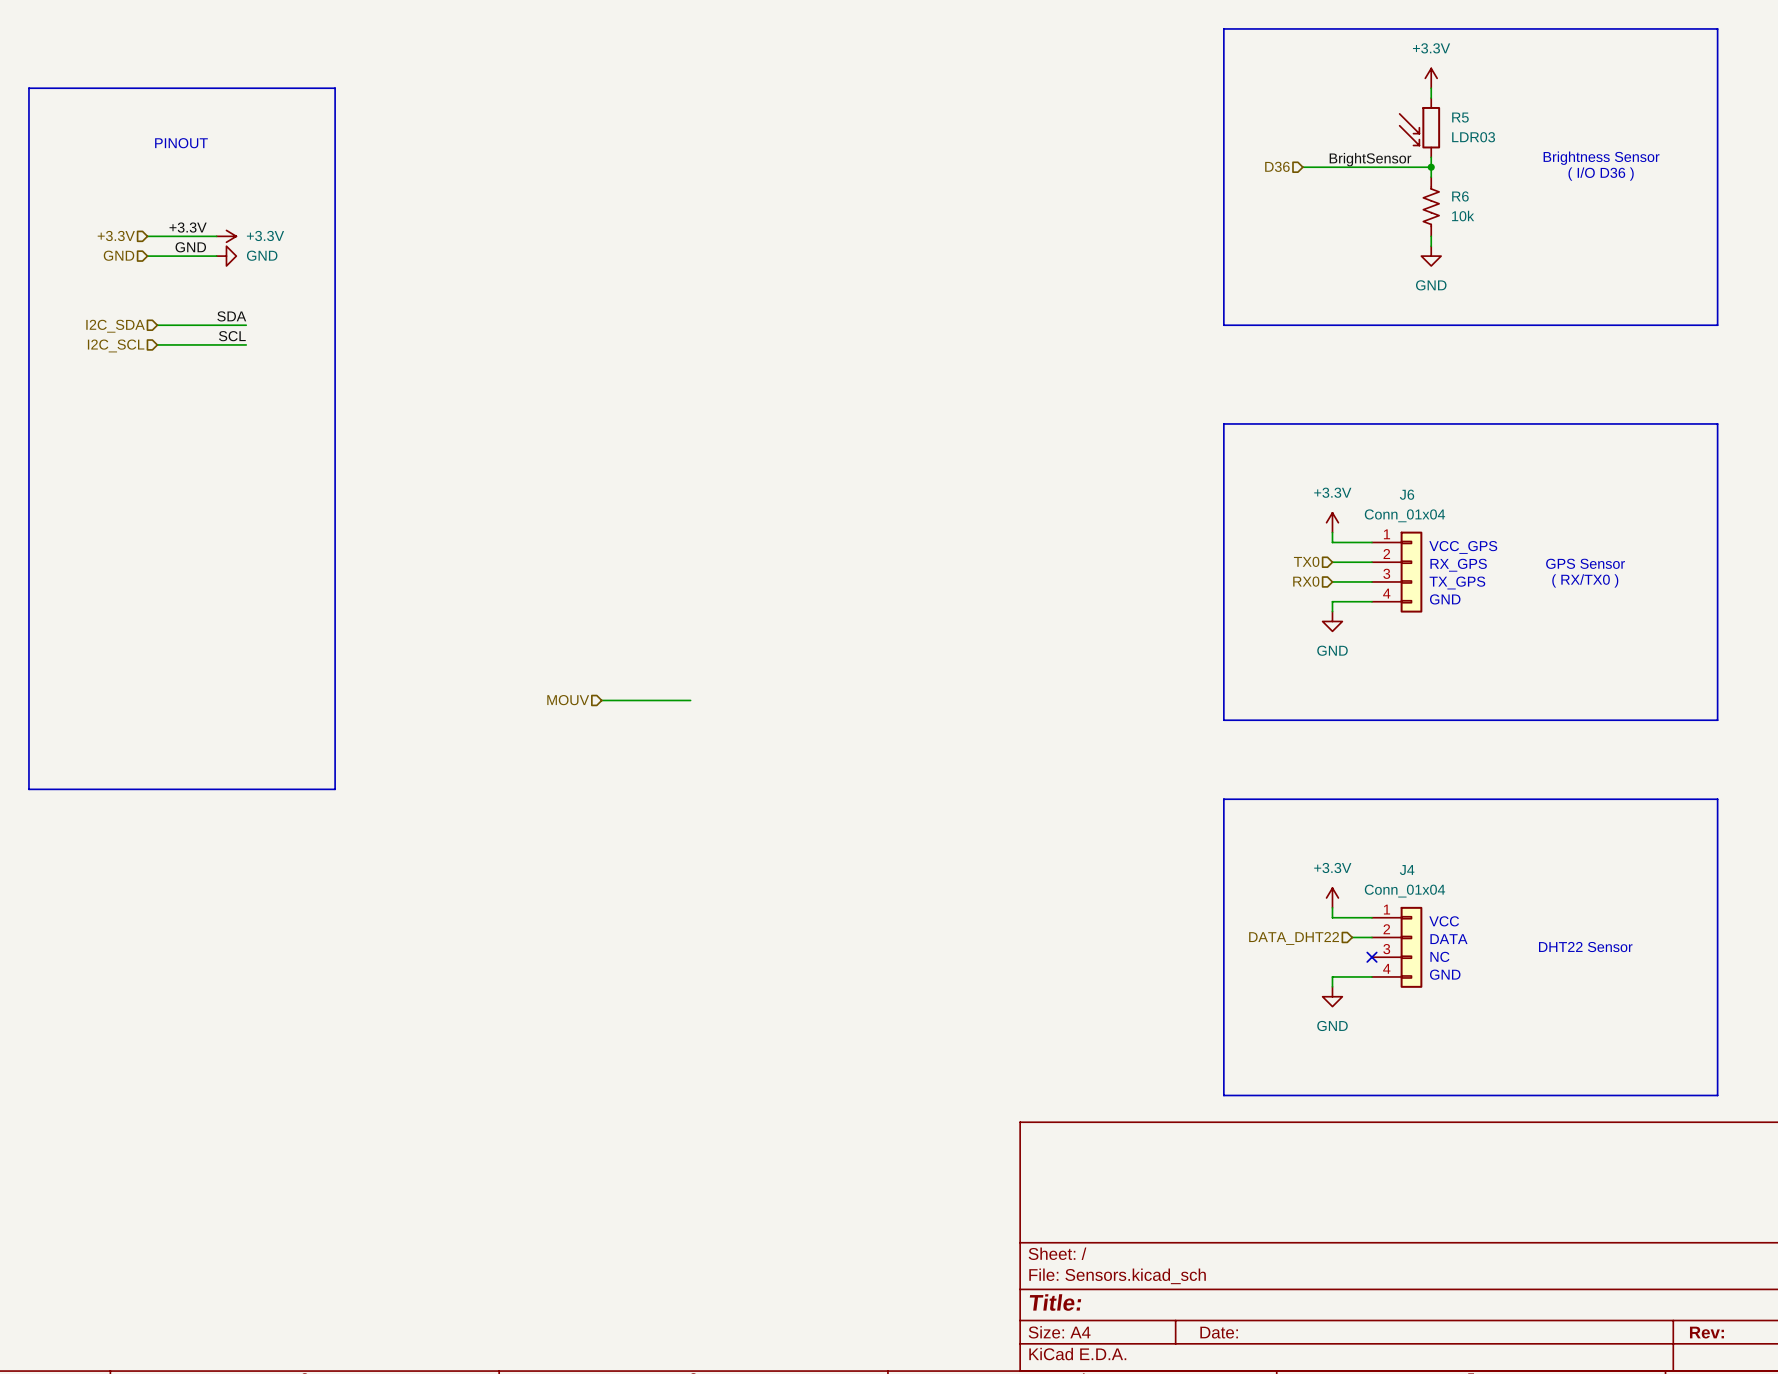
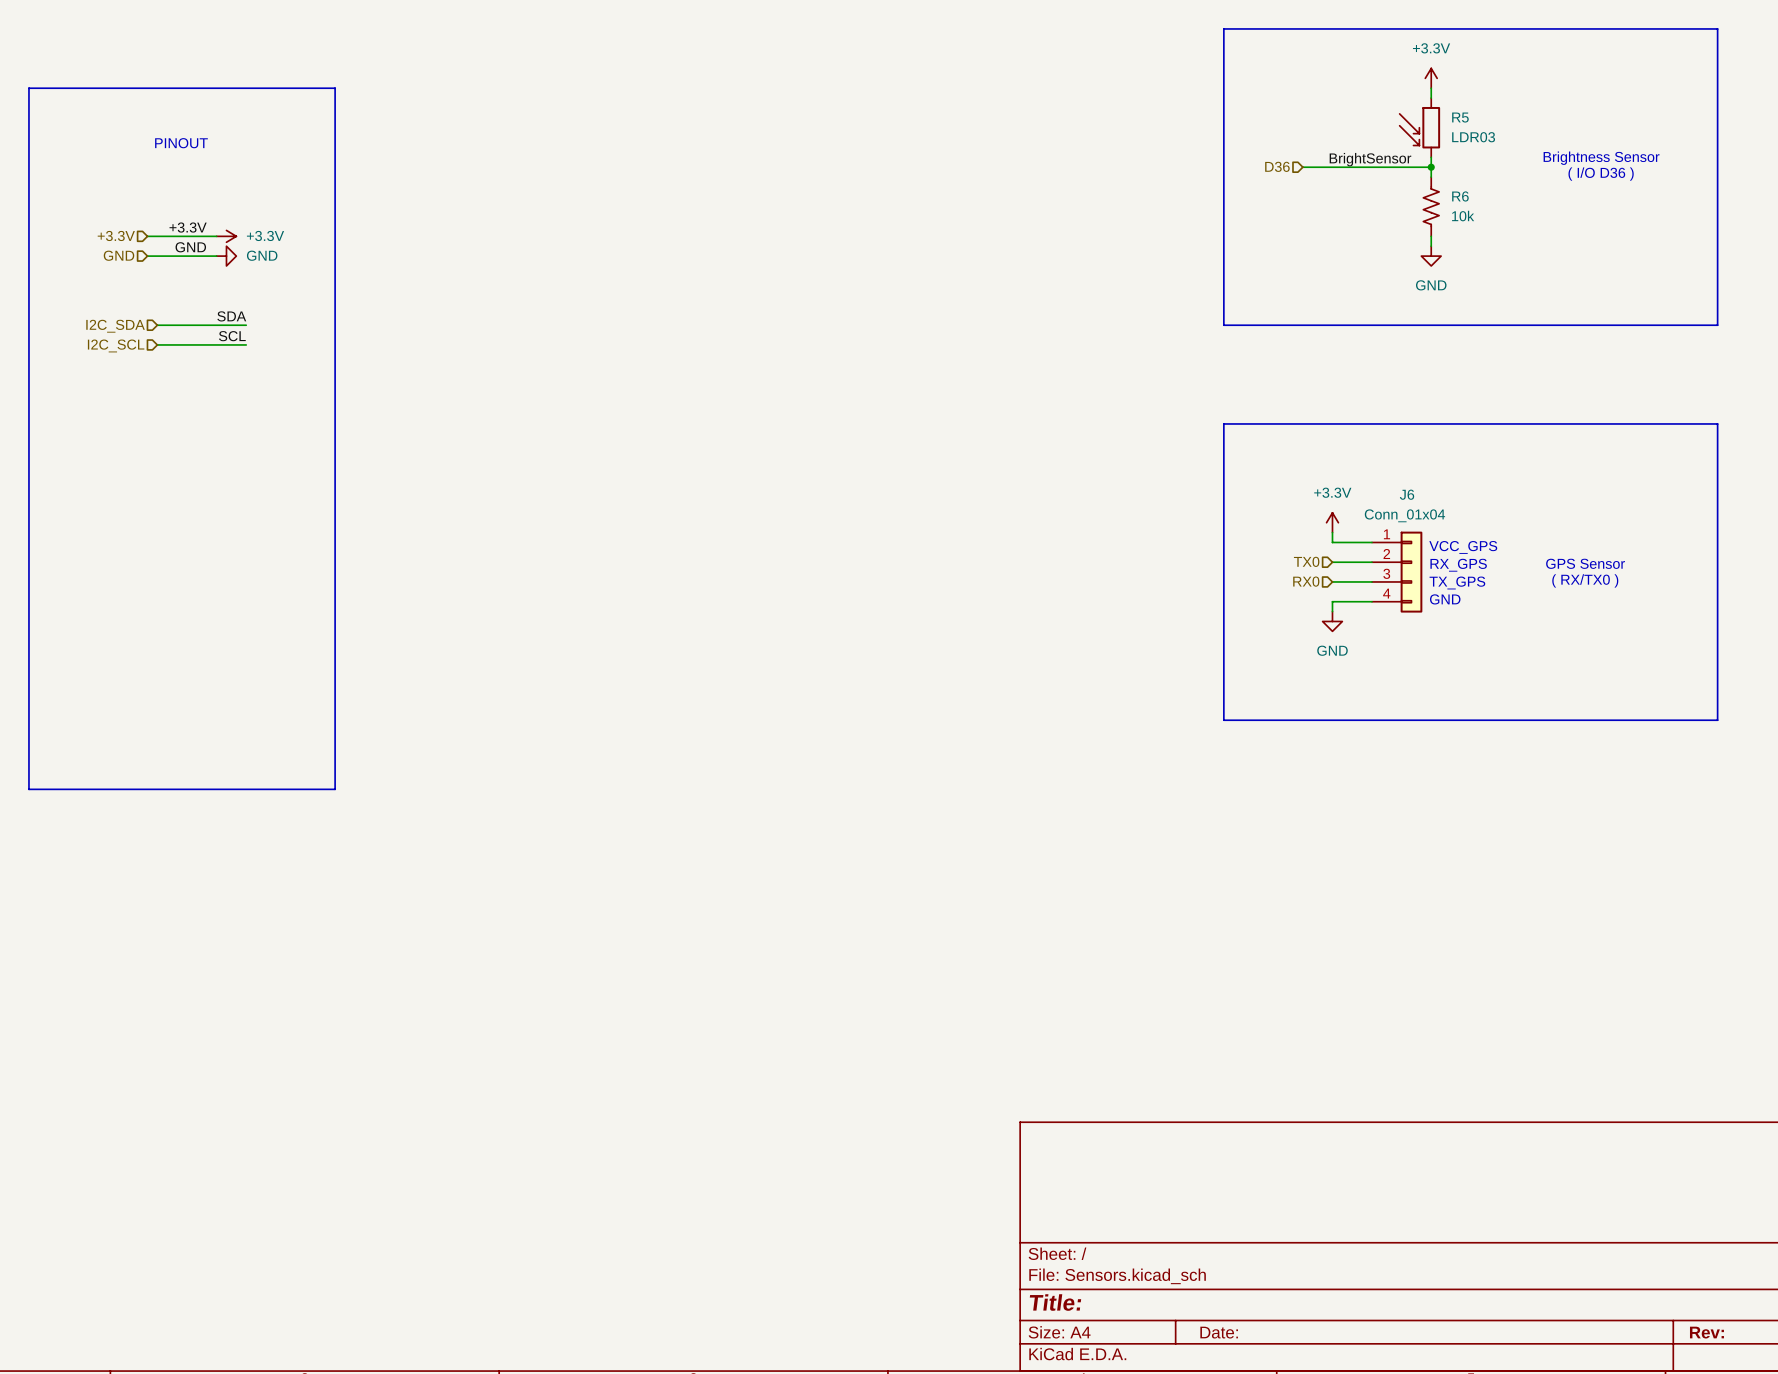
hierarchical label: MOUV (568, 700) -> none
wire: (601, 700) (690, 700) -> none
line: (1223, 799) (1717, 799) (1717, 1095) (1223, 1095) (1223, 799) -> none
power symbol: +3.3V (1332, 897) -> none
wire: (1332, 907) (1332, 917) (1371, 917) -> none
text: VCC (1444, 921) -> none
wire: (1352, 937) (1371, 937) -> none
hierarchical label: DATA_DHT22 (1294, 938) -> none
text: DATA (1448, 939) -> none
J4: Conn_01x04 (1397, 947) -> none
text: DHT22 Sensor (1585, 947) -> none
text: NC (1439, 956) -> none
no-connect mark: (1371, 957) -> none
text: GND (1445, 974) -> none
wire: (1371, 976) (1332, 976) (1332, 986) -> none
power symbol: GND (1332, 996) -> none

